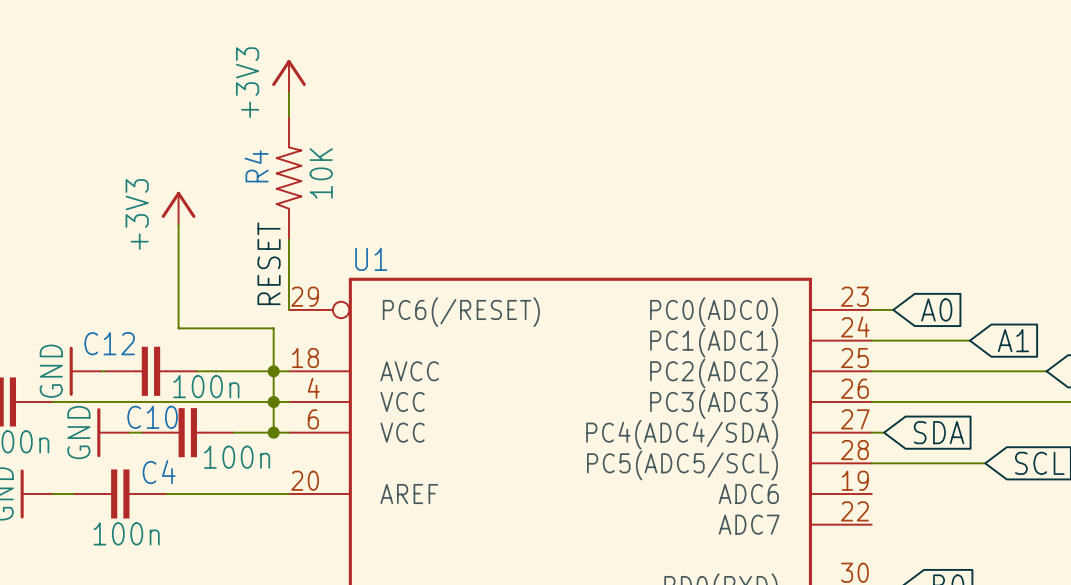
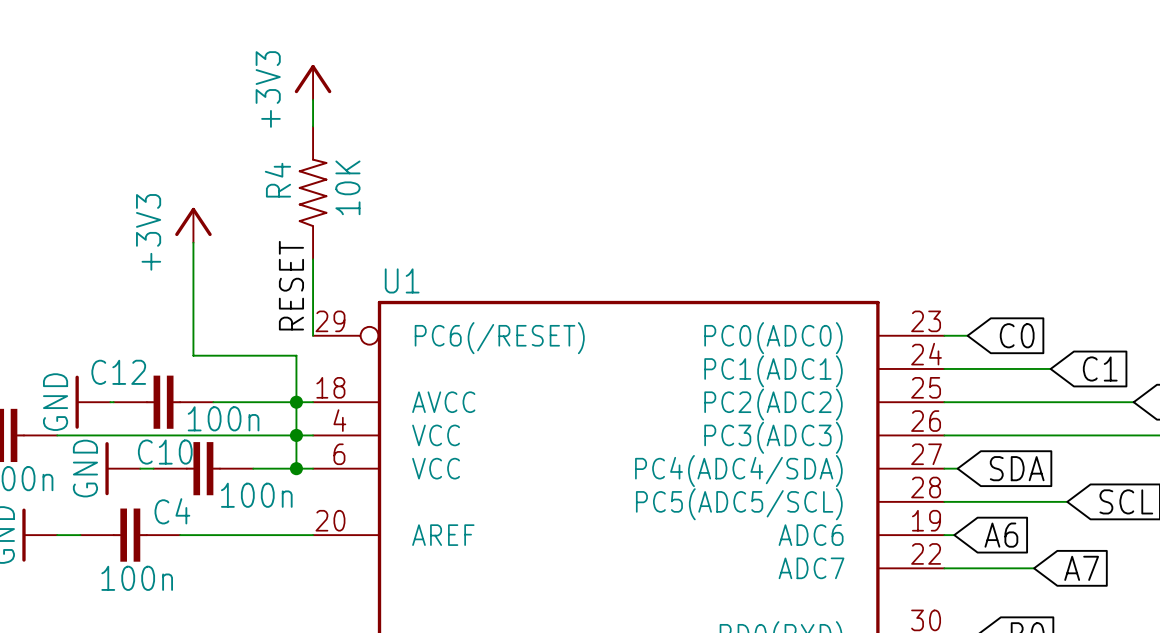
global label: A0 (936, 309) -> C0 (1017, 335)
global label: A1 (1013, 340) -> C1 (1100, 368)
wire: none -> (944, 535) (954, 535)
global label: none -> A6 (1001, 535)
wire: none -> (944, 568) (1034, 568)
global label: none -> A7 (1081, 568)

